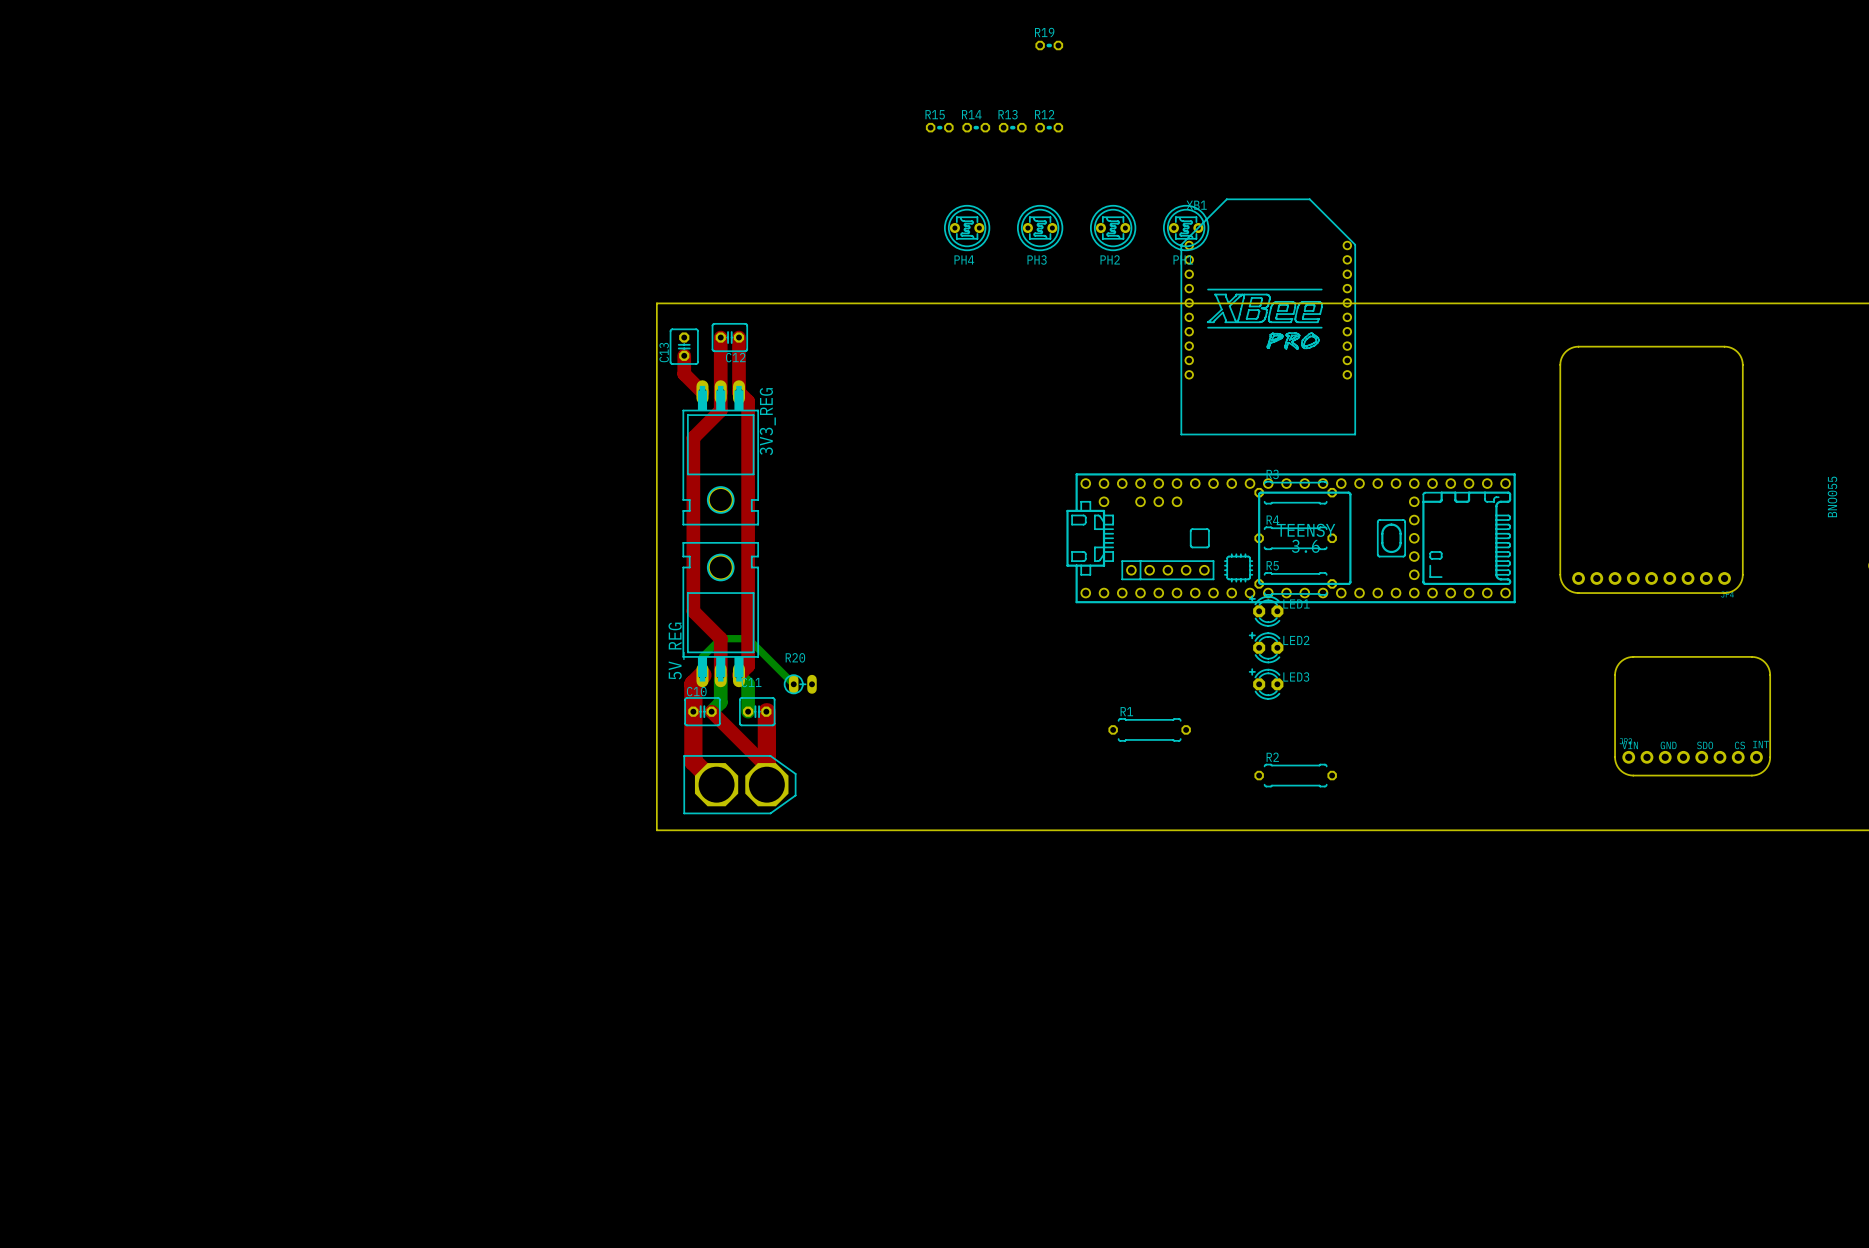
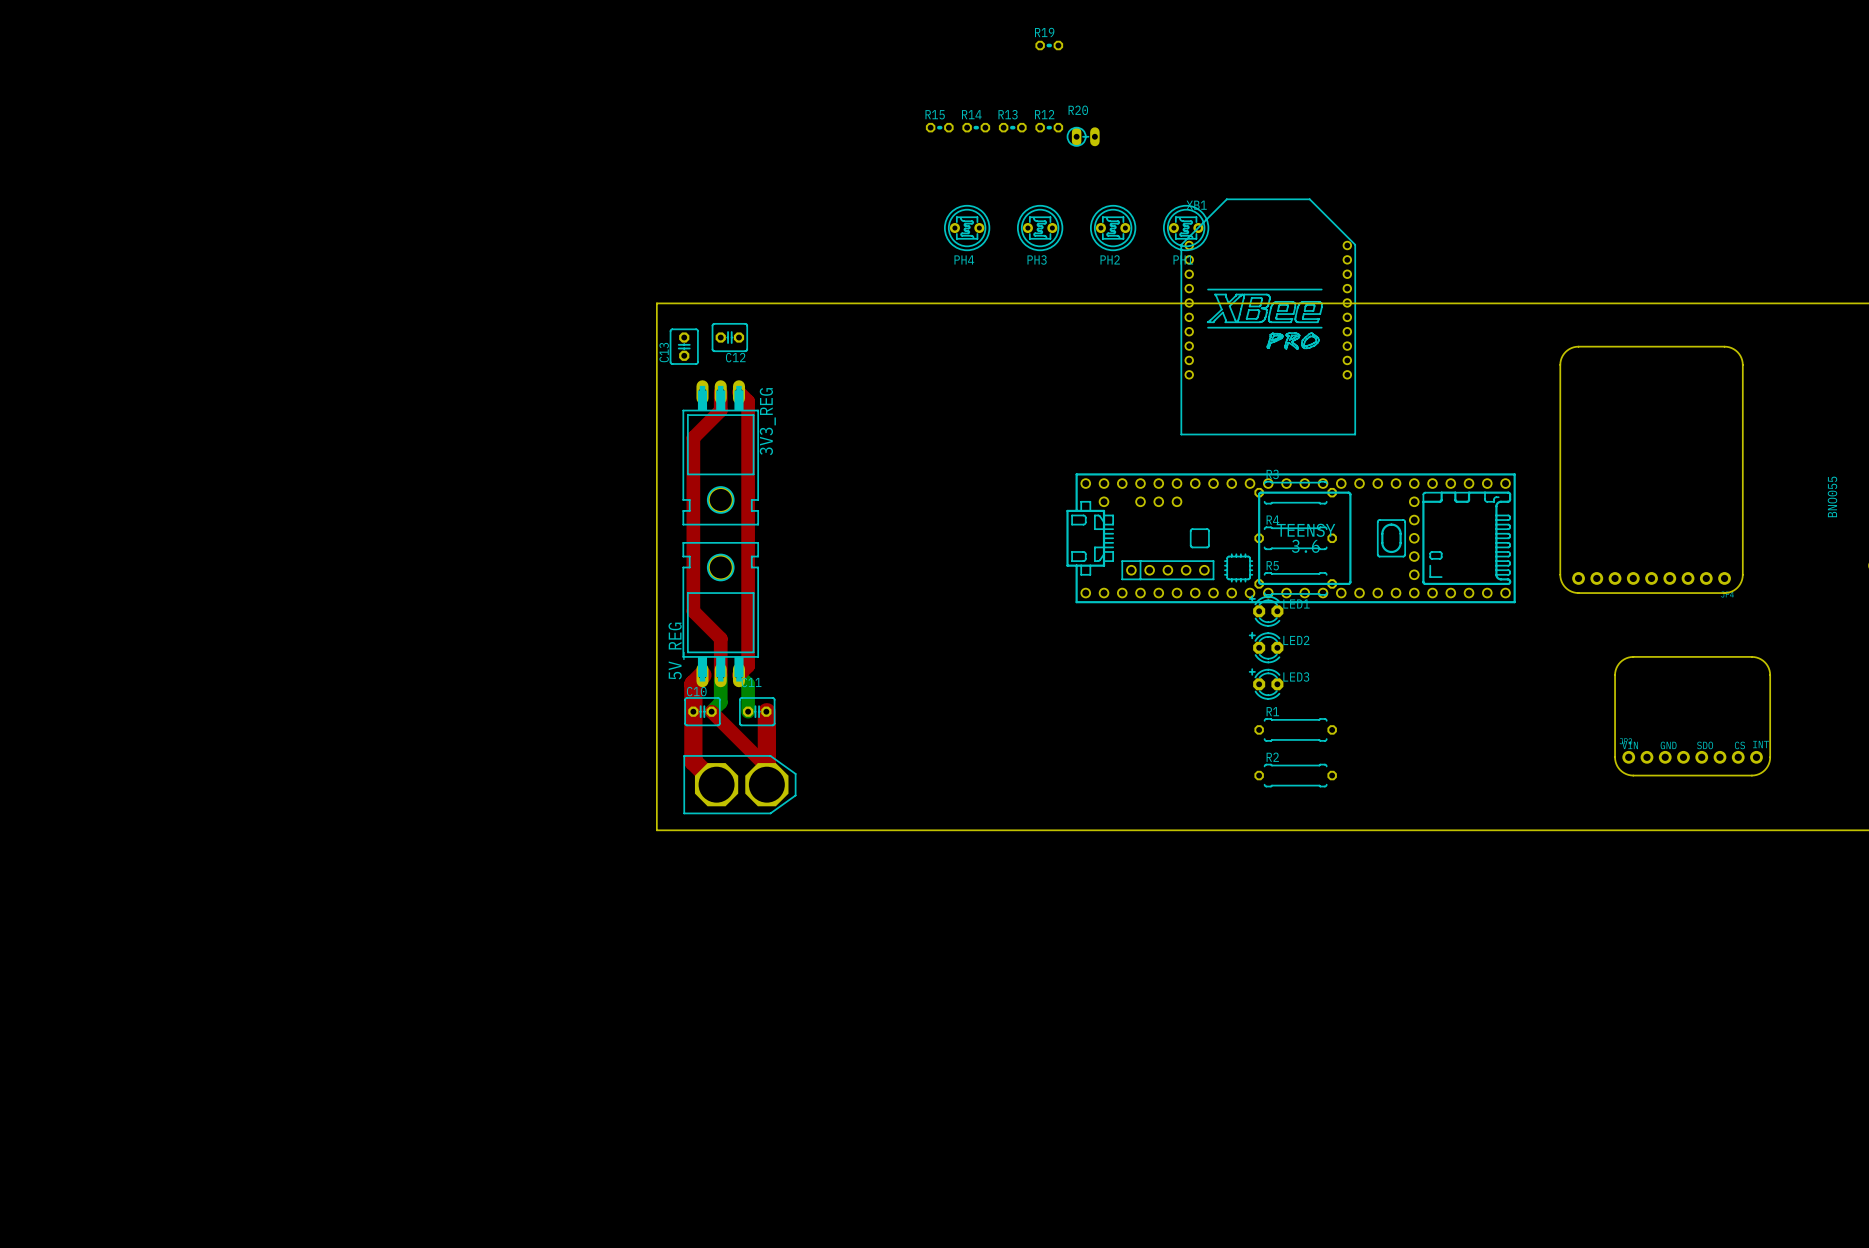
top track: (720, 337) (720, 392) -> none
top track: (738, 337) (738, 392) -> none
top track: (684, 355) (684, 374) (702, 392) -> none
bottom track: (702, 675) (702, 656) (720, 638) (748, 638) (793, 684) -> none
R20 position: (800, 684) -> (1083, 136)
R1 position: (1149, 729) -> (1295, 729)

